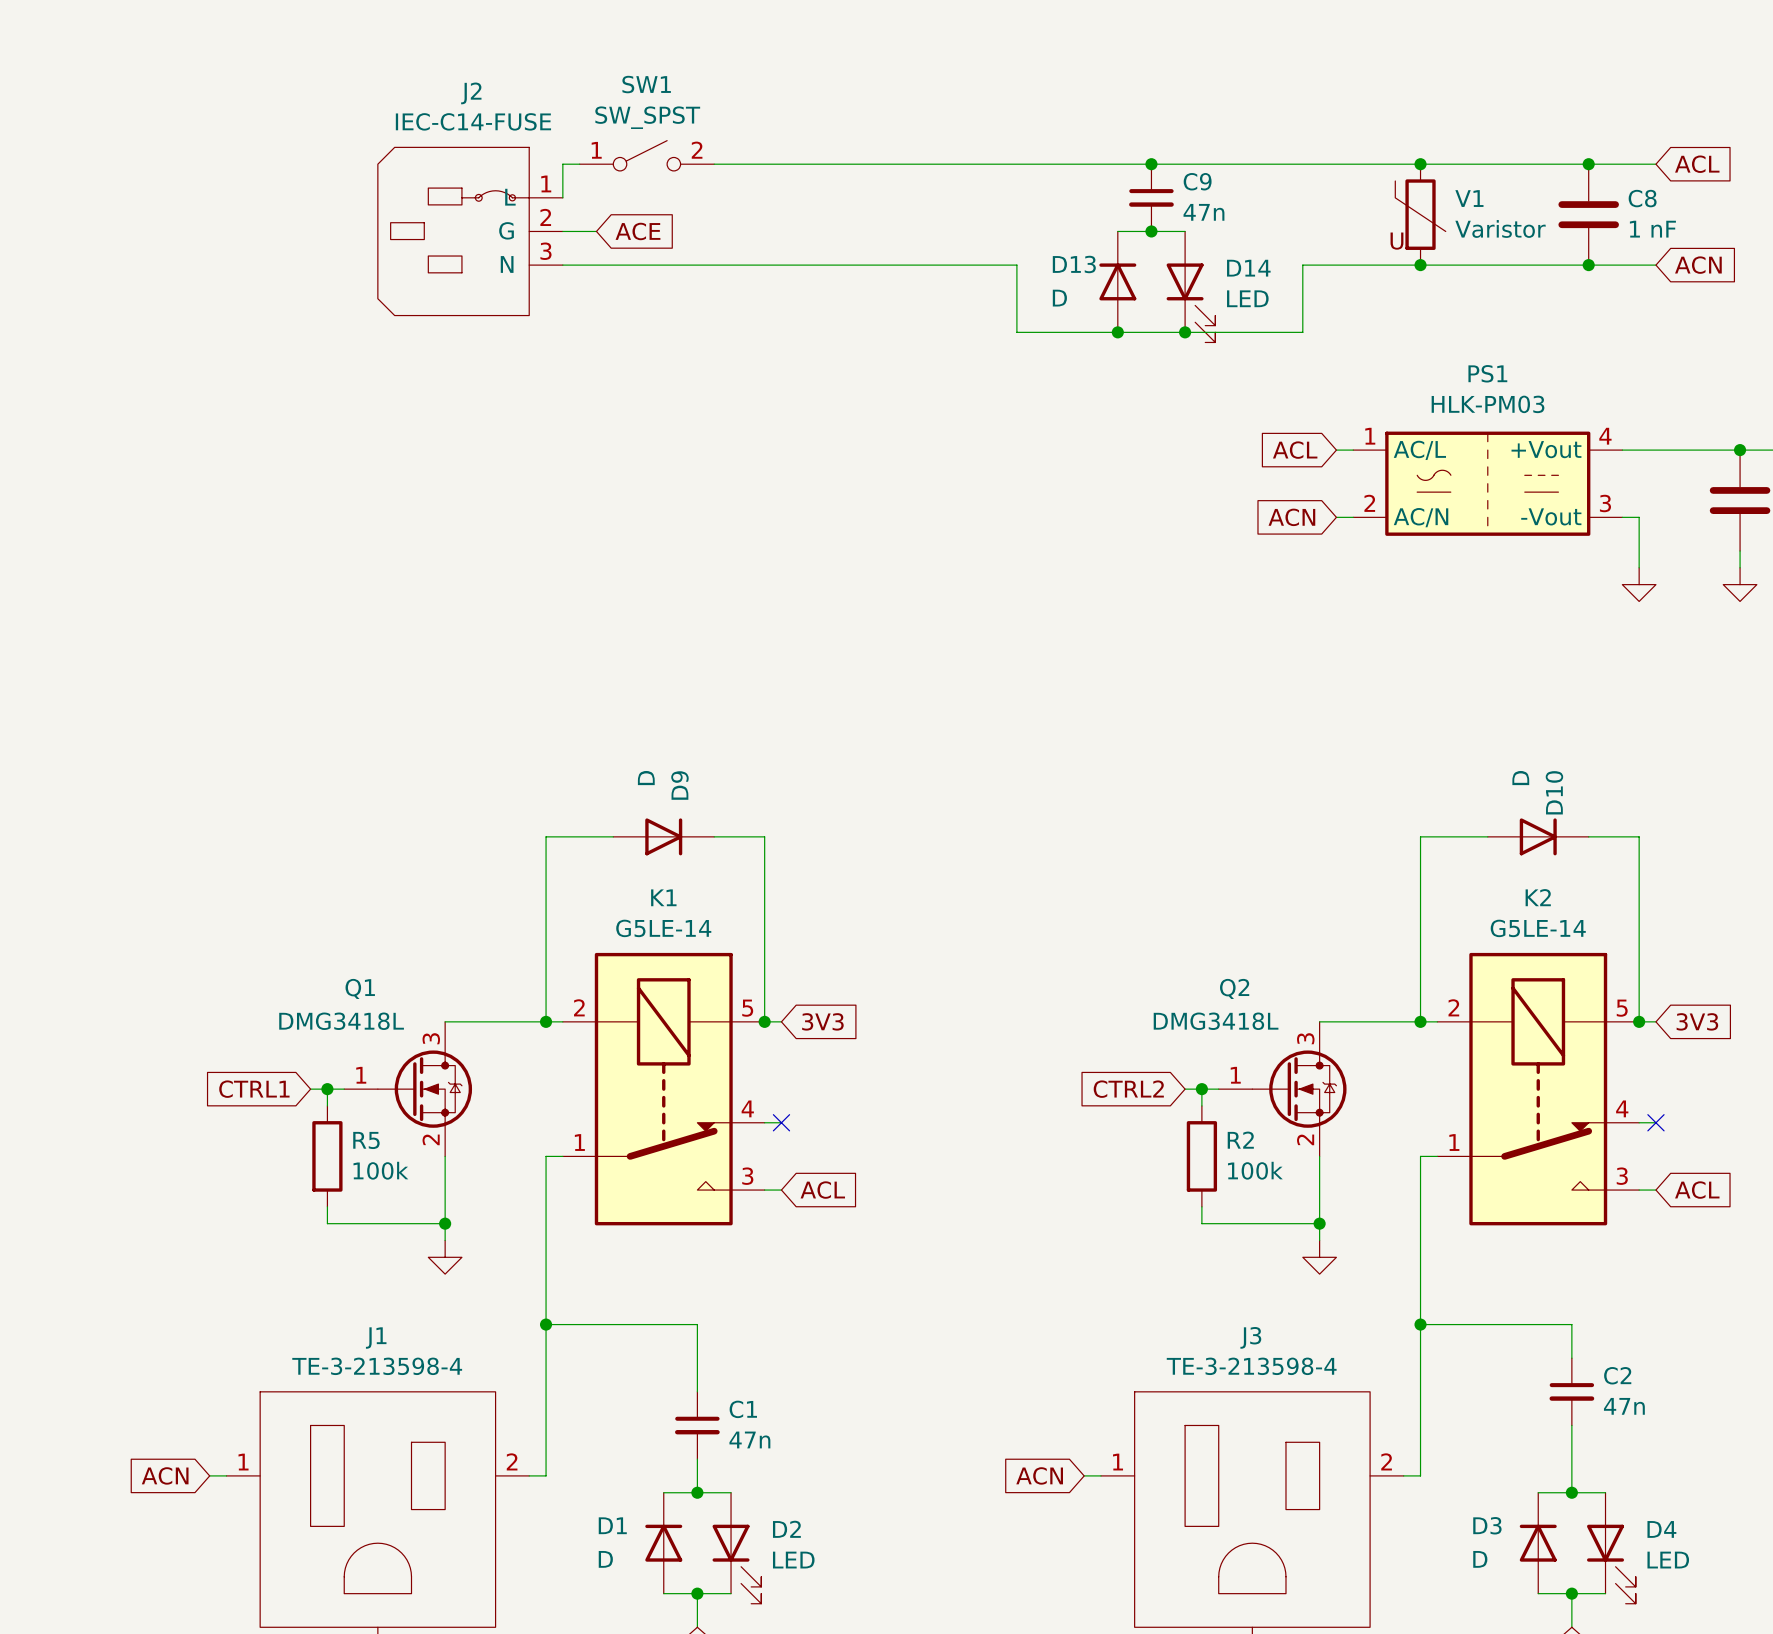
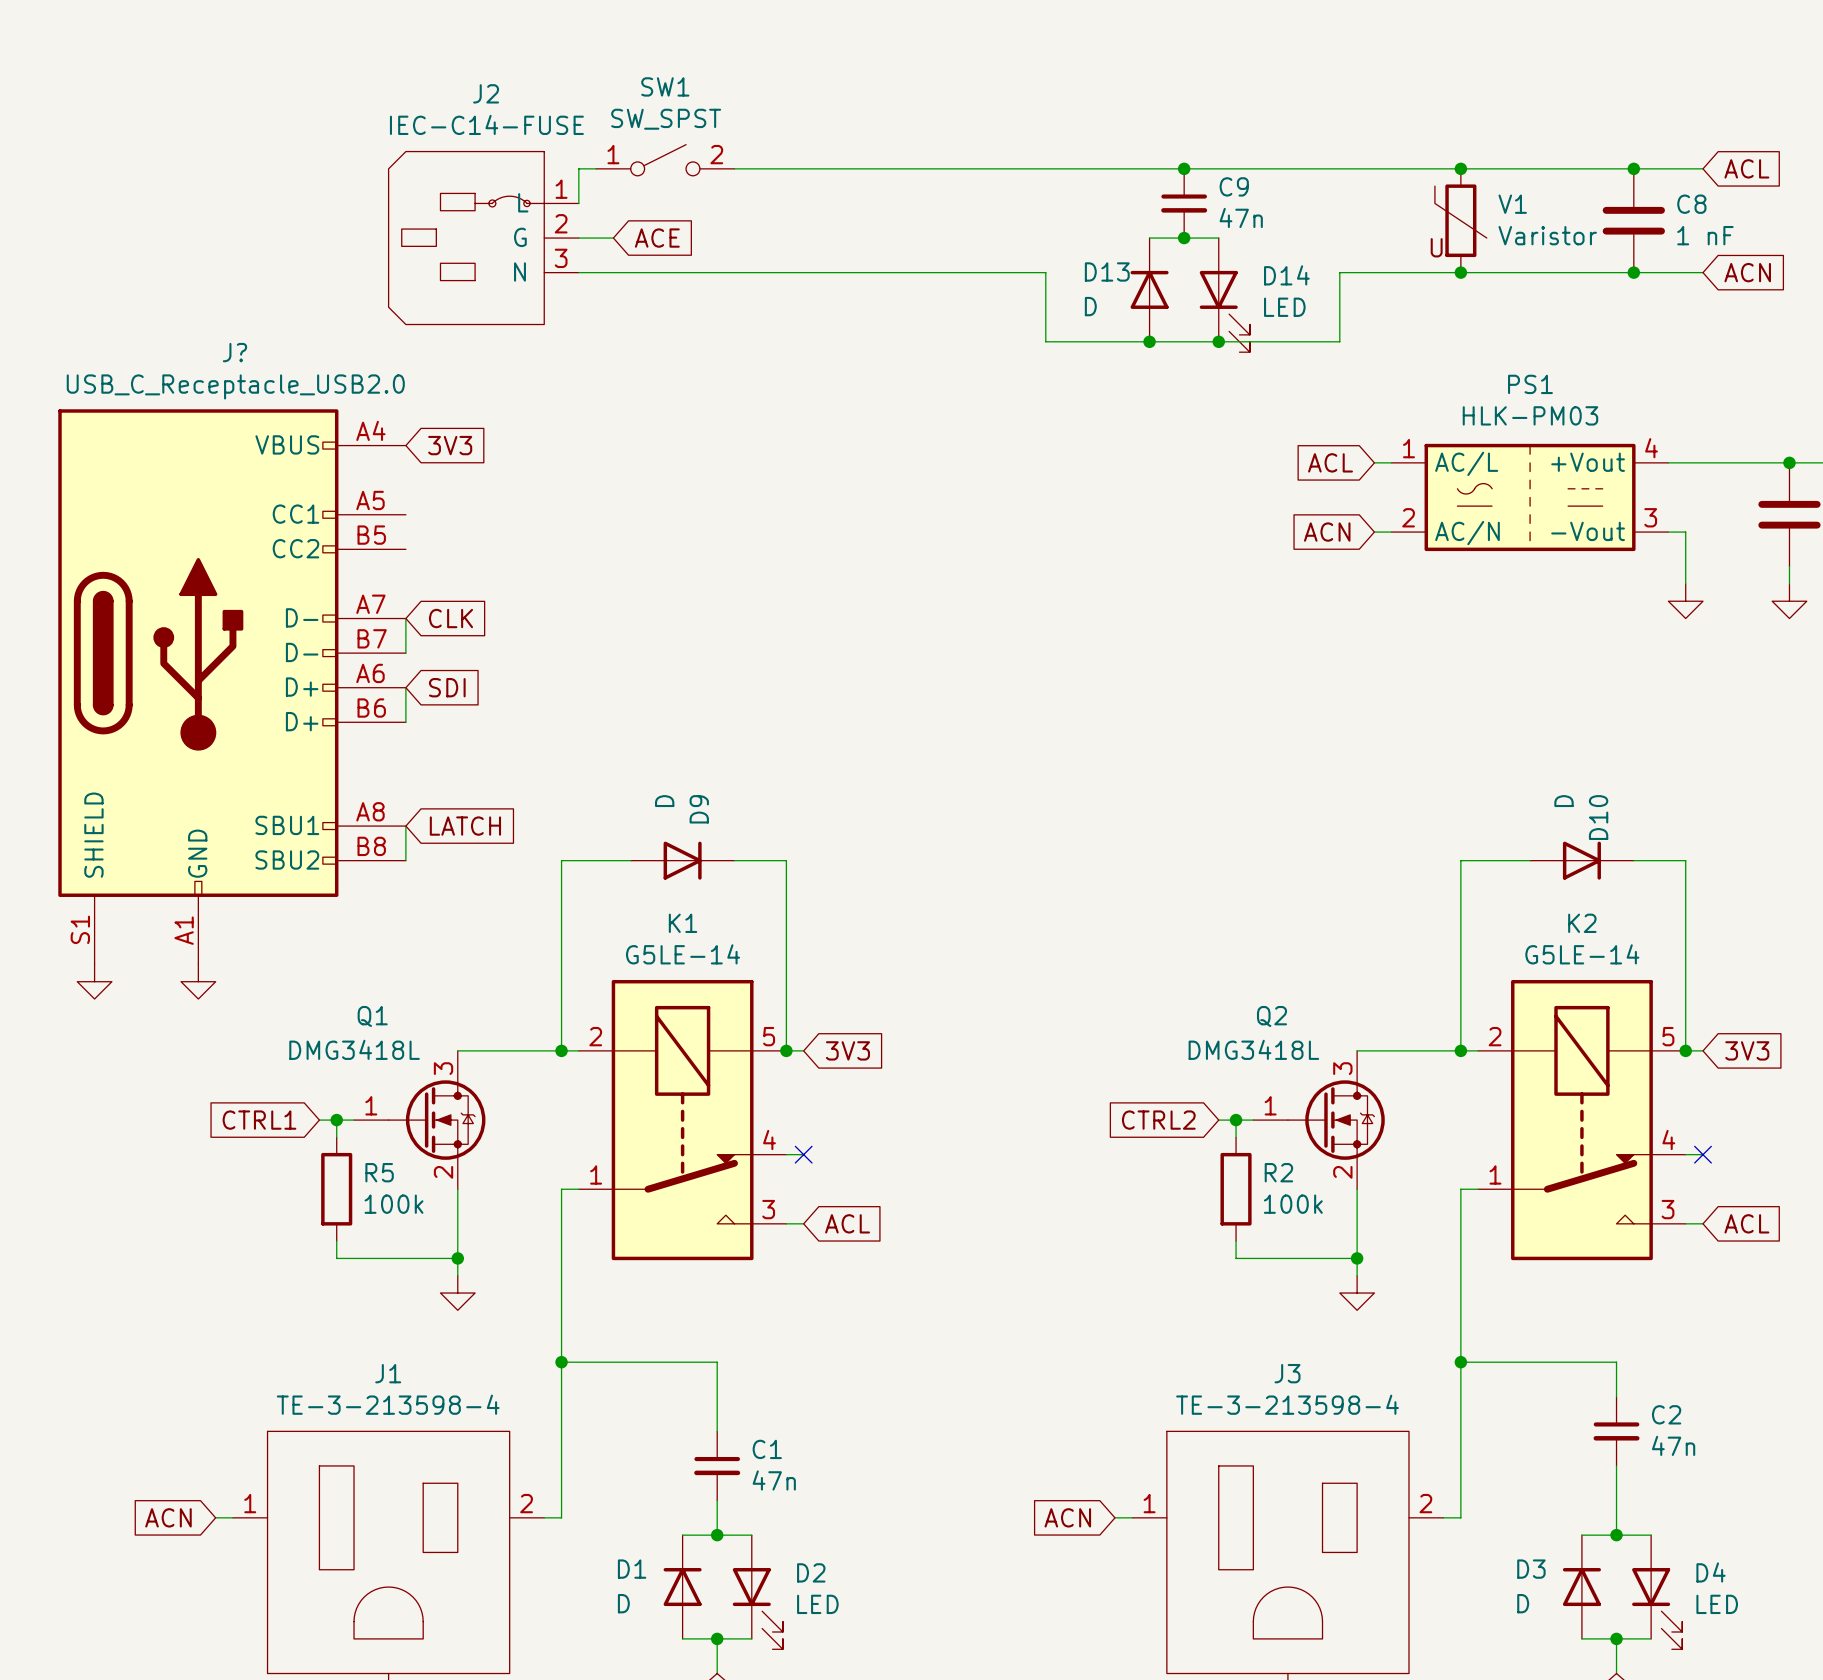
global label: none -> 3V3 (450, 445)
wire: none -> (405, 618) (405, 653)
global label: none -> CLK (451, 618)
J?: none -> USB_C_Receptacle_USB2.0 (232, 686)
wire: none -> (405, 687) (405, 722)
global label: none -> SDI (447, 687)
wire: none -> (405, 826) (405, 860)
global label: none -> LATCH (465, 826)
power symbol: none -> (94, 981)
power symbol: none -> (198, 981)

